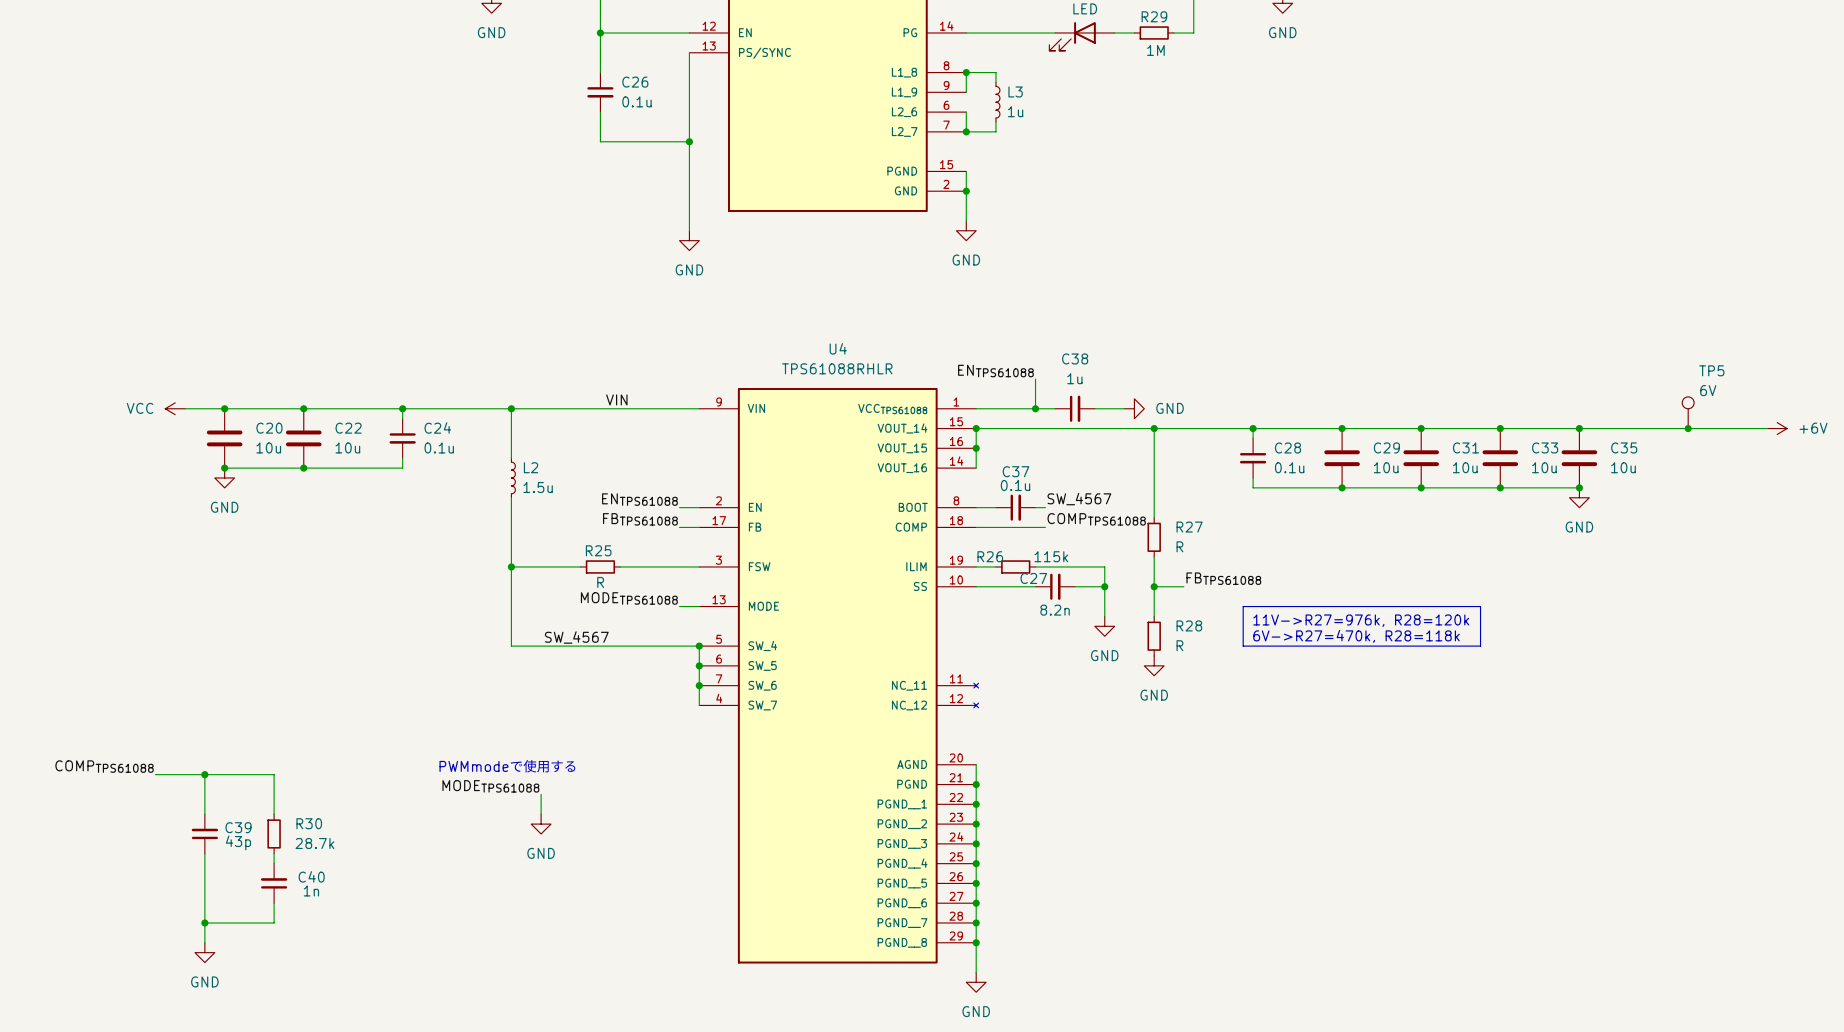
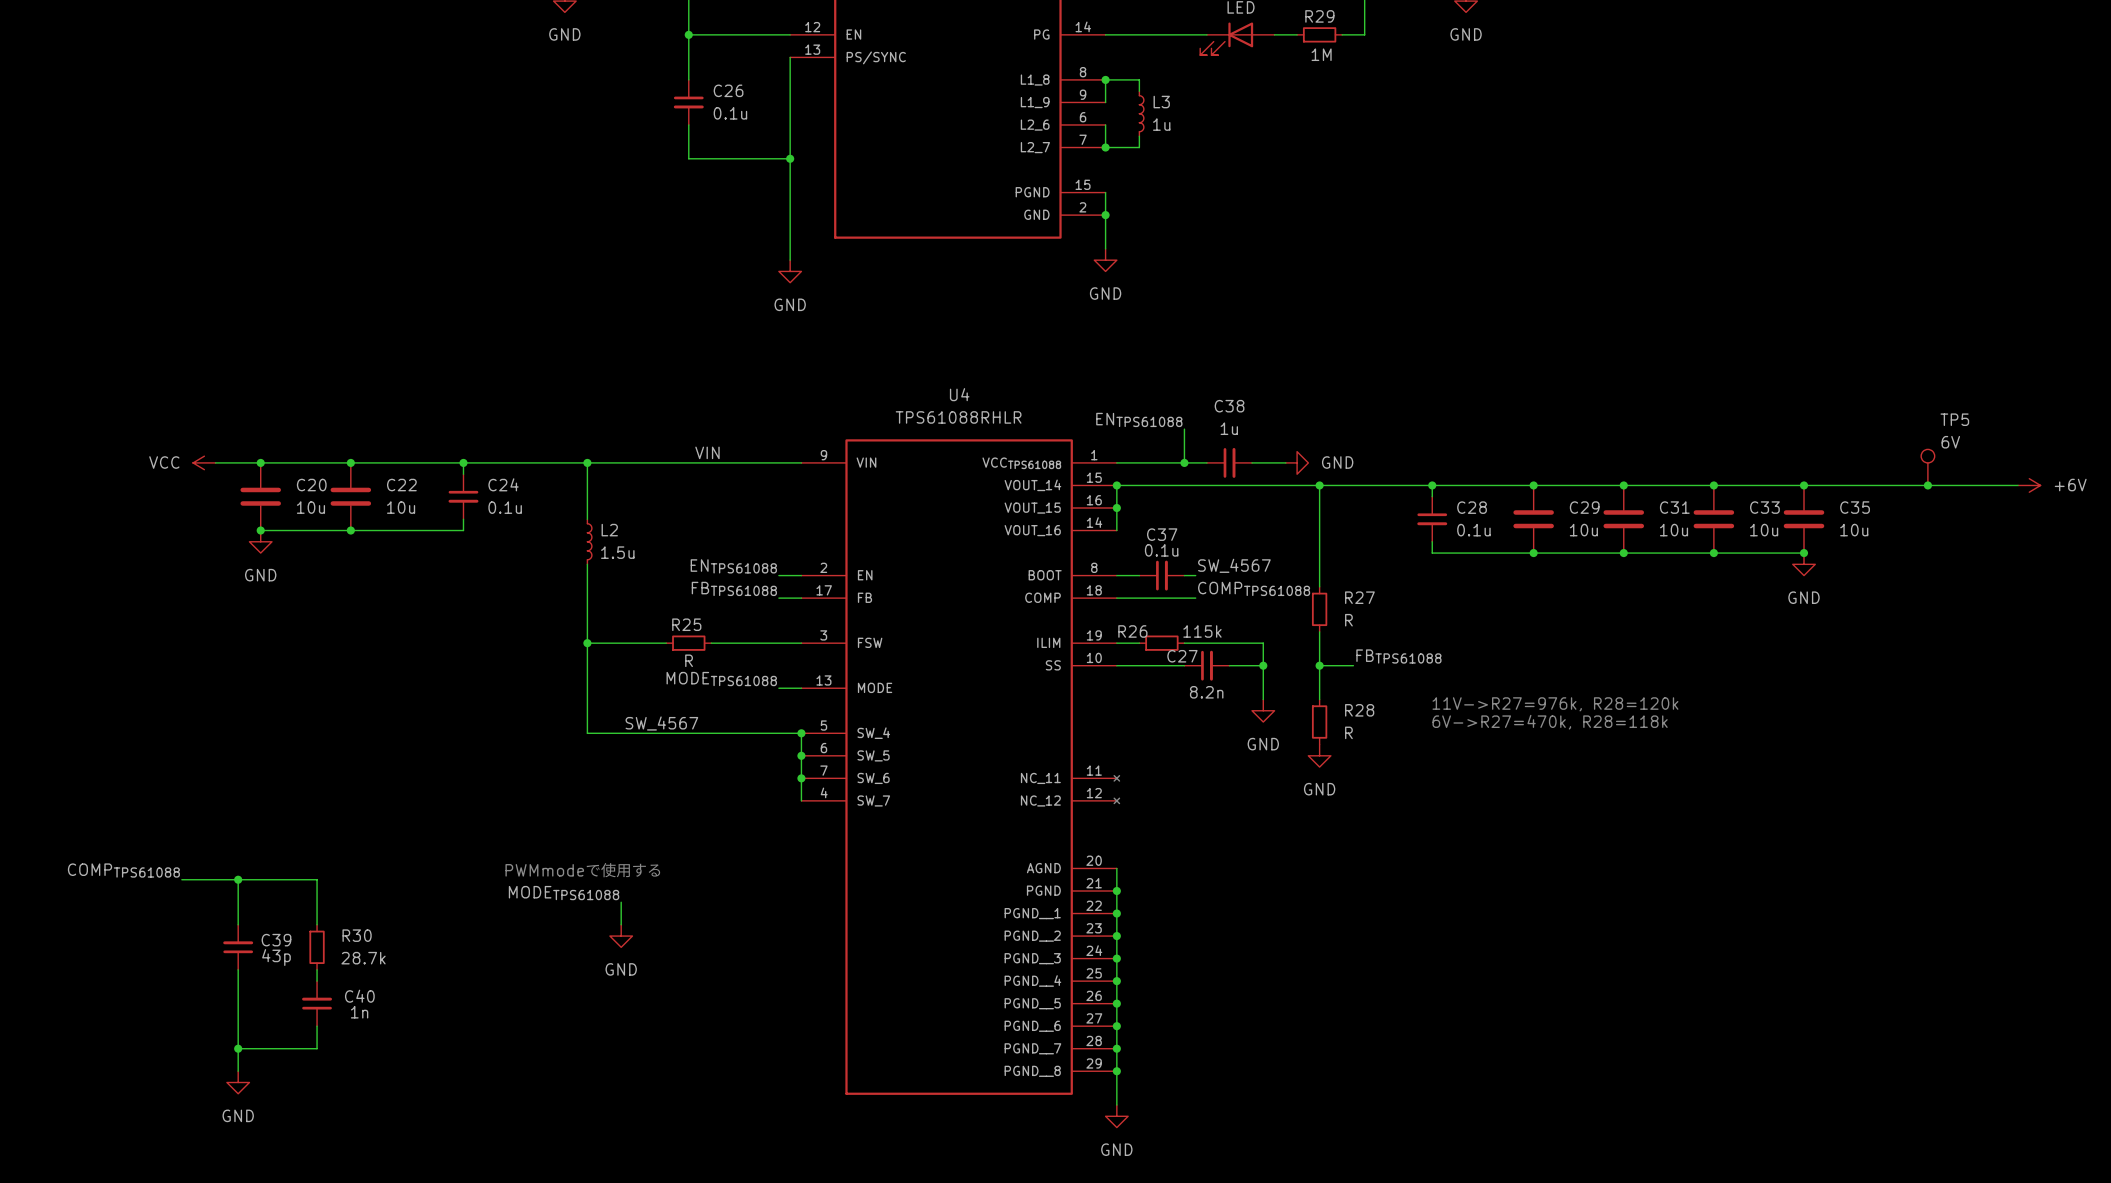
line: (1243, 606) (1480, 606) (1480, 646) (1243, 646) (1243, 606) -> none

